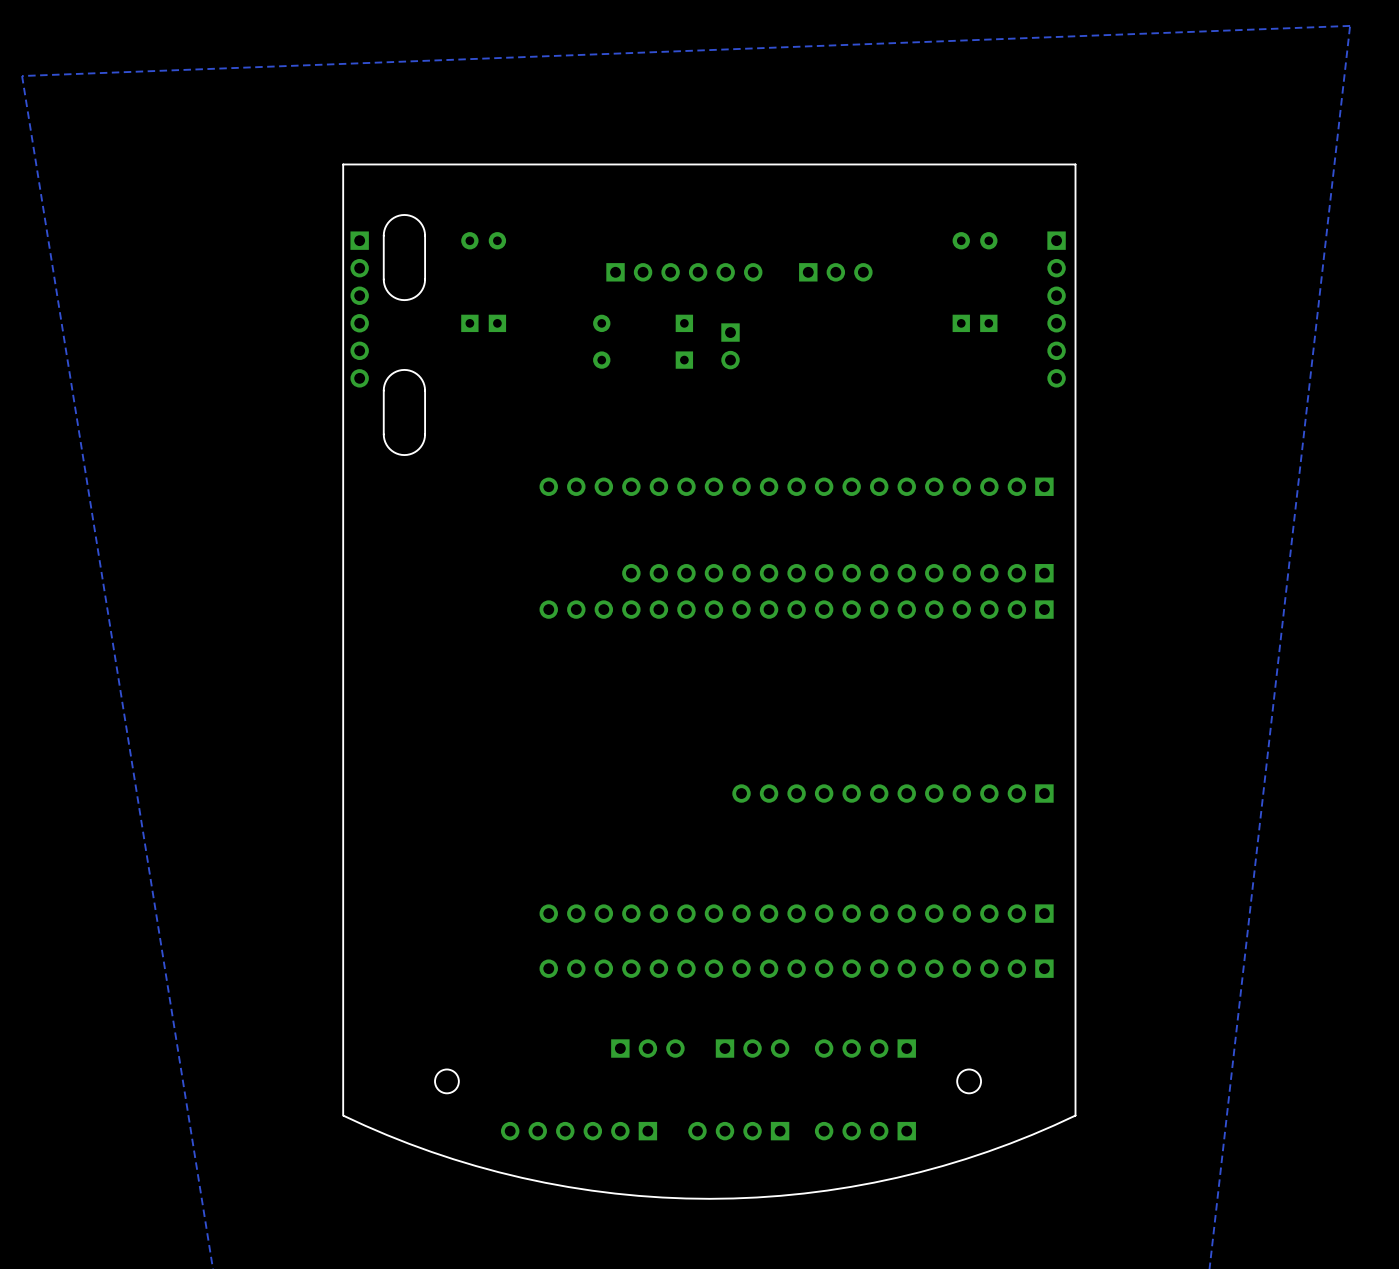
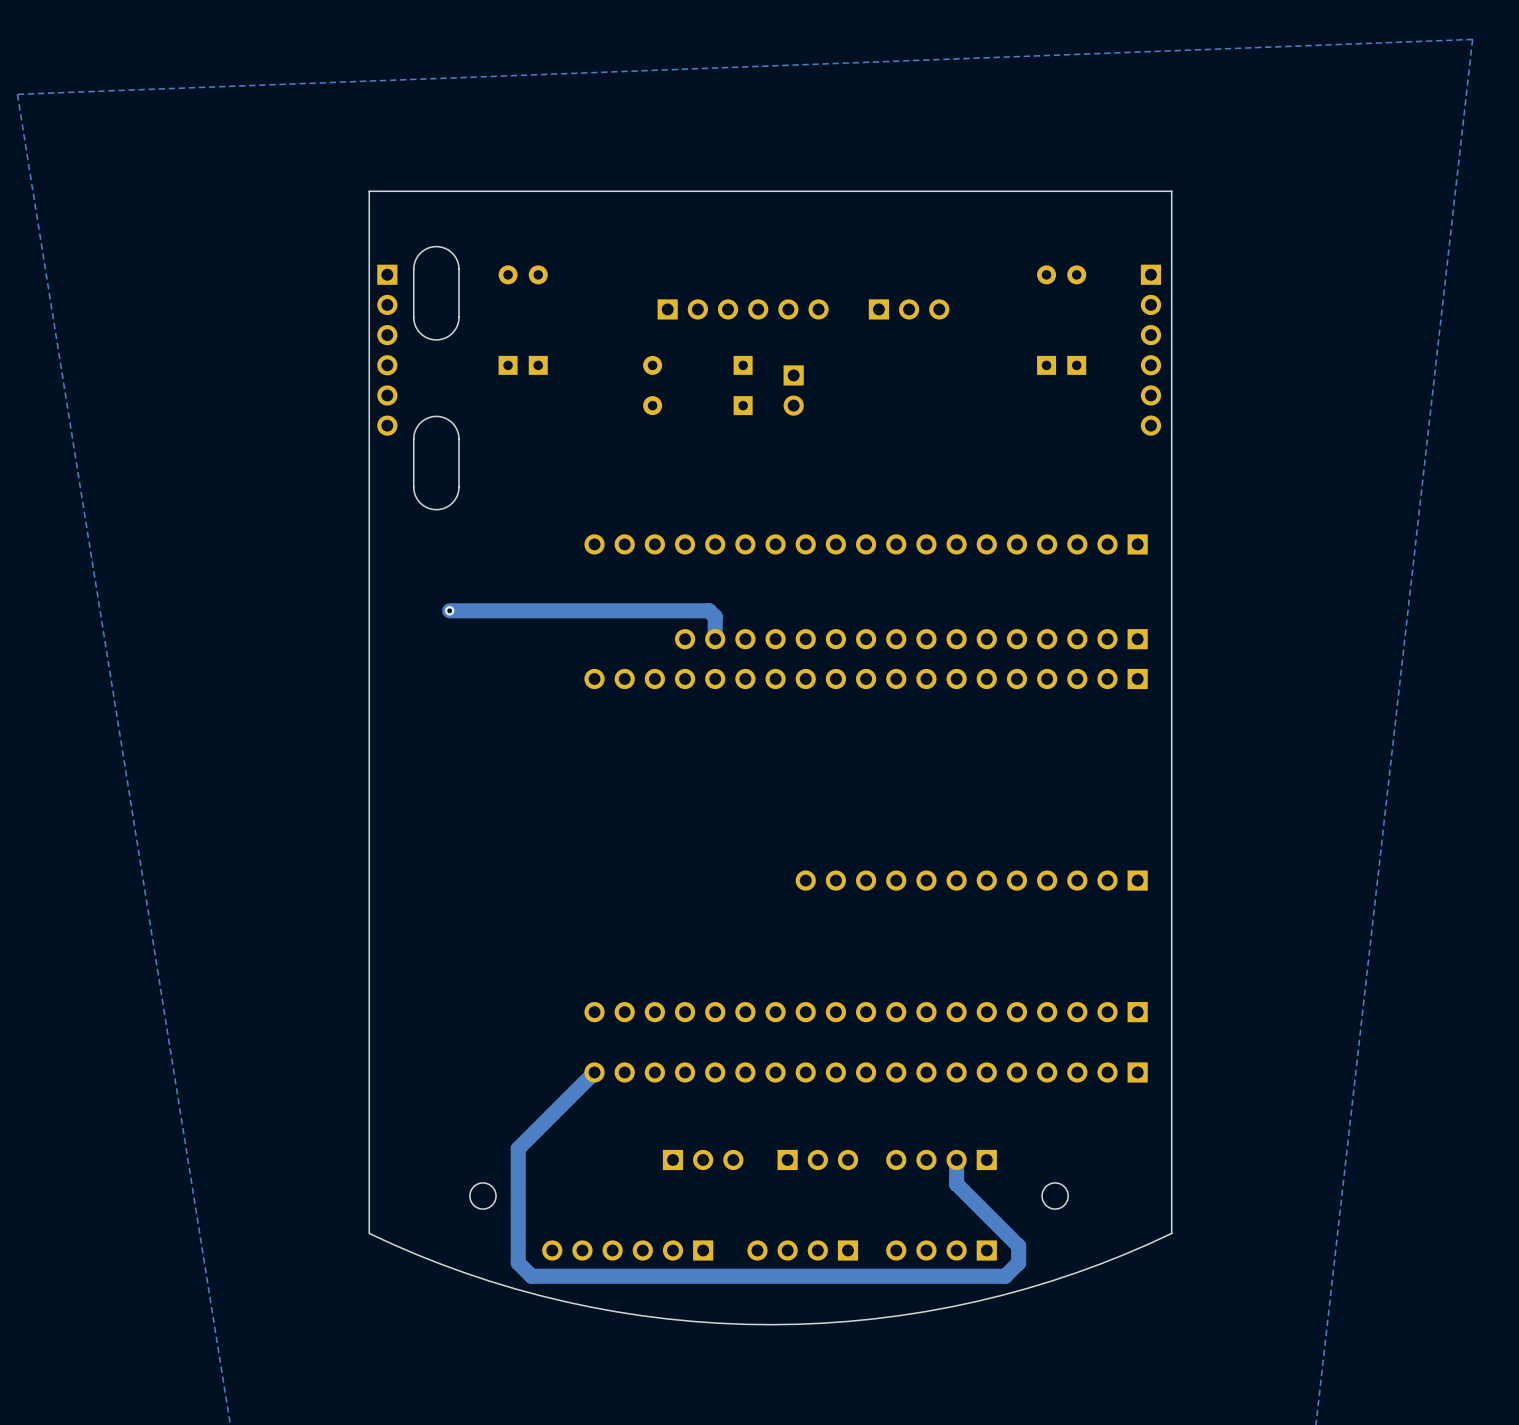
track: none -> (449, 610) (709, 610) (715, 616) (715, 639)
via: none -> (449, 610)
track: none -> (594, 1072) (518, 1148) (518, 1262) (531, 1276) (1005, 1276) (1018, 1262) (1018, 1246) (956, 1184) (956, 1159)

